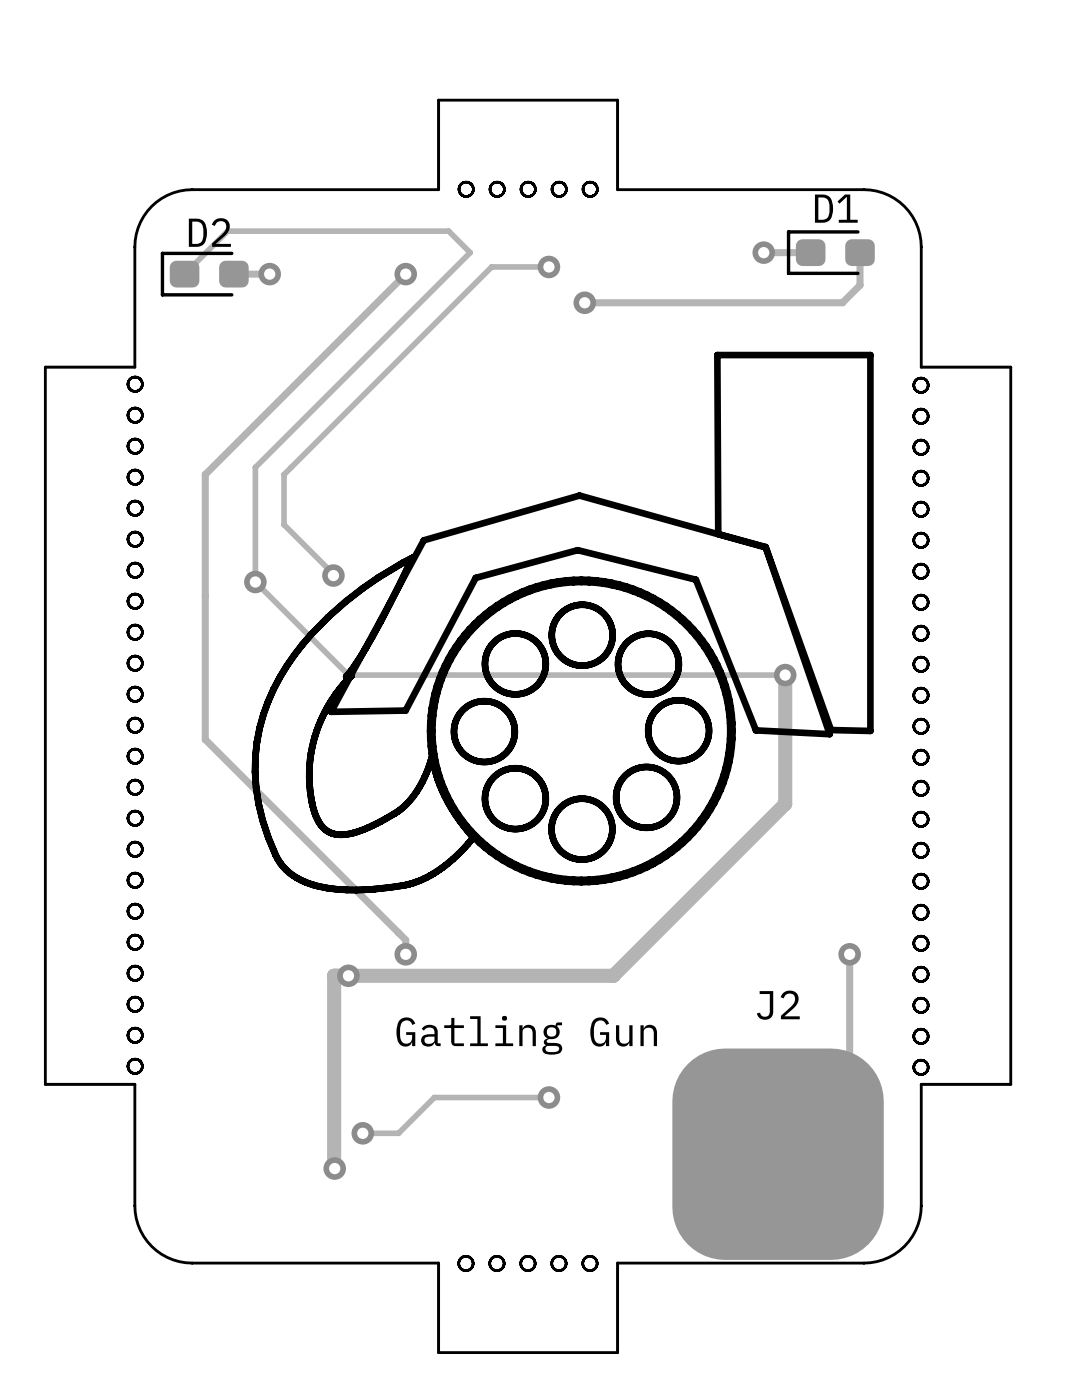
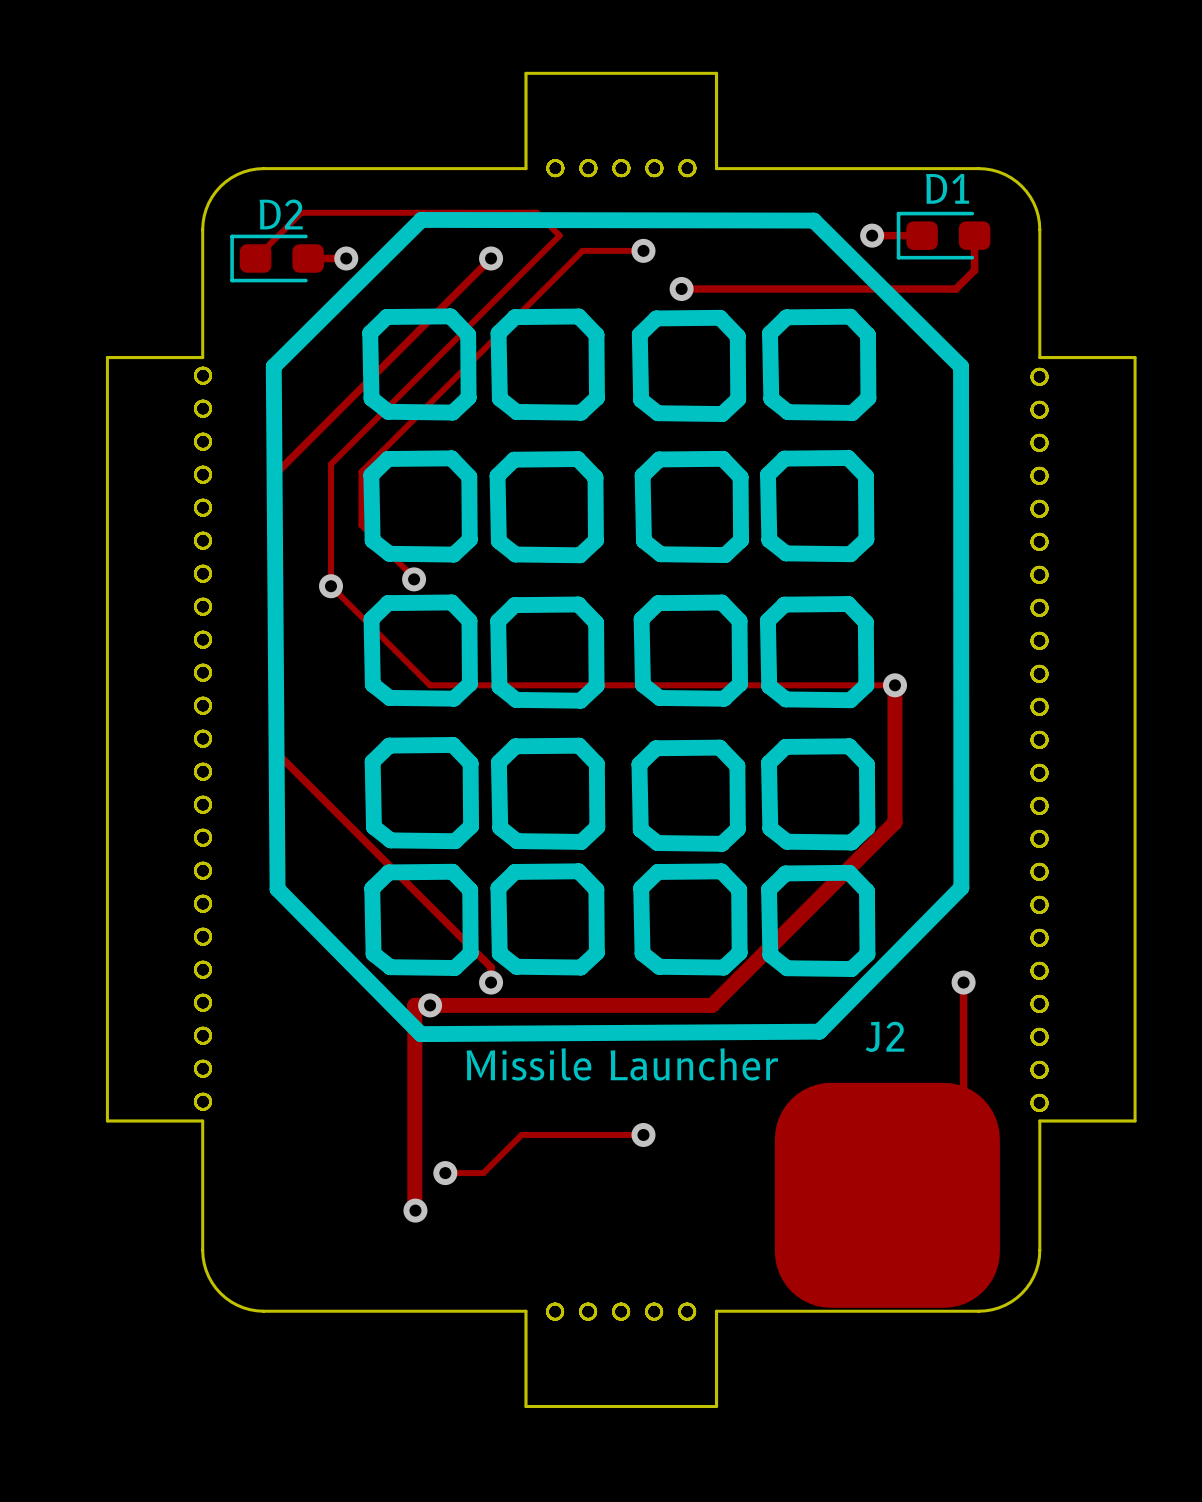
line: none -> (421, 219) (813, 220) (961, 366) (961, 887) (819, 1031) (420, 1034) (277, 889) (273, 366) (421, 219)
line: none -> (450, 316) (386, 316) (370, 333) (371, 398) (388, 411) (452, 412) (468, 397) (468, 334) (450, 316)
line: none -> (578, 316) (515, 317) (498, 333) (499, 398) (516, 411) (581, 412) (596, 397) (596, 334) (578, 316)
line: none -> (850, 316) (867, 335) (868, 398) (852, 412) (788, 412) (771, 398) (770, 333) (786, 317) (850, 316)
line: none -> (720, 317) (737, 336) (738, 399) (722, 414) (657, 413) (641, 400) (639, 334) (656, 318) (720, 317)
line: (717, 355) (718, 534) (765, 547) (831, 730) (870, 730) (870, 355) (717, 355) -> none
line: none -> (451, 458) (469, 476) (469, 539) (453, 554) (389, 553) (372, 540) (371, 475) (387, 458) (451, 458)
line: none -> (848, 457) (784, 458) (767, 474) (769, 540) (786, 553) (850, 554) (866, 539) (865, 476) (848, 457)
line: none -> (577, 459) (514, 459) (497, 475) (498, 541) (515, 554) (580, 555) (595, 540) (595, 477) (577, 459)
line: none -> (722, 458) (659, 459) (642, 475) (643, 541) (660, 554) (725, 555) (741, 540) (740, 477) (722, 458)
line: (579, 495) (423, 540) (331, 711) (405, 710) (475, 577) (577, 550) (695, 579) (755, 730) (829, 734) (765, 547) (579, 495) -> none
line: (412, 557) (362, 588) (328, 617) (310, 634) (279, 677) (263, 714) (256, 742) (255, 771) (262, 820) (280, 863) (293, 875) (313, 885) (337, 889) (356, 890) (390, 887) (413, 882) (430, 875) (445, 865) (473, 837) (458, 818) (444, 795) (436, 775) (432, 754) (422, 781) (409, 801) (394, 813) (364, 829) (344, 834) (329, 832) (318, 821) (311, 802) (309, 777) (310, 758) (320, 721) (335, 694) (351, 675) (346, 676) (372, 636) (412, 557) -> none
line: (573, 581) (604, 582) (632, 589) (659, 602) (682, 619) (701, 641) (716, 665) (726, 693) (731, 723) (729, 753) (722, 782) (709, 808) (692, 831) (671, 851) (646, 866) (618, 876) (589, 880) (558, 879) (529, 871) (503, 859) (480, 842) (461, 820) (446, 796) (435, 768) (431, 738) (432, 708) (440, 679) (452, 653) (470, 630) (491, 610) (516, 595) (543, 585) (573, 581) -> none
line: none -> (451, 602) (388, 603) (371, 619) (372, 684) (389, 697) (454, 698) (469, 683) (469, 620) (451, 602)
line: none -> (721, 602) (658, 603) (641, 619) (642, 684) (659, 697) (724, 698) (740, 683) (739, 620) (721, 602)
line: none -> (848, 604) (865, 622) (866, 685) (850, 700) (785, 699) (769, 686) (767, 620) (784, 604) (848, 604)
line: none -> (578, 604) (596, 622) (596, 685) (580, 700) (516, 699) (499, 686) (498, 621) (514, 605) (578, 604)
line: (580, 604) (592, 606) (602, 612) (609, 621) (612, 633) (610, 645) (604, 655) (595, 662) (583, 665) (571, 663) (561, 657) (554, 648) (551, 636) (553, 624) (559, 614) (569, 607) (580, 604) -> none
line: (513, 633) (525, 635) (535, 641) (542, 651) (545, 662) (544, 673) (537, 684) (528, 691) (516, 694) (505, 692) (495, 686) (487, 676) (484, 665) (486, 653) (492, 643) (502, 636) (513, 633) -> none
line: (646, 633) (658, 635) (668, 641) (676, 651) (678, 662) (677, 674) (671, 684) (661, 691) (649, 694) (638, 692) (628, 686) (620, 676) (618, 665) (619, 654) (625, 643) (635, 636) (646, 633) -> none
line: (677, 700) (689, 702) (699, 708) (706, 717) (709, 729) (707, 741) (701, 751) (691, 758) (680, 761) (668, 759) (658, 753) (651, 743) (648, 732) (650, 720) (656, 710) (665, 703) (677, 700) -> none
line: (482, 701) (471, 704) (461, 711) (455, 721) (454, 733) (456, 744) (463, 754) (473, 760) (485, 761) (497, 759) (506, 752) (512, 742) (514, 730) (511, 718) (504, 709) (494, 703) (482, 701) -> none
line: none -> (452, 744) (470, 763) (471, 826) (455, 841) (390, 840) (373, 827) (372, 761) (389, 745) (452, 744)
line: none -> (579, 745) (596, 764) (597, 827) (581, 841) (516, 841) (500, 827) (498, 762) (515, 746) (579, 745)
line: none -> (849, 746) (785, 746) (768, 763) (770, 828) (787, 841) (851, 842) (867, 827) (866, 764) (849, 746)
line: none -> (719, 747) (737, 765) (737, 828) (721, 843) (657, 843) (640, 829) (639, 764) (656, 748) (719, 747)
line: (643, 767) (655, 768) (665, 773) (673, 783) (676, 794) (675, 806) (670, 816) (660, 824) (649, 827) (637, 826) (627, 820) (619, 811) (616, 800) (617, 788) (622, 778) (632, 770) (643, 767) -> none
line: (513, 768) (502, 771) (492, 778) (486, 788) (484, 800) (487, 811) (495, 821) (505, 827) (516, 829) (528, 826) (537, 819) (544, 808) (545, 797) (542, 785) (535, 776) (525, 769) (513, 768) -> none
line: (581, 798) (593, 801) (603, 807) (609, 817) (612, 829) (609, 840) (603, 850) (593, 857) (581, 859) (570, 857) (560, 850) (553, 840) (551, 829) (553, 817) (560, 807) (570, 801) (581, 798) -> none
line: none -> (578, 871) (515, 871) (498, 888) (499, 953) (516, 966) (580, 967) (596, 952) (596, 889) (578, 871)
line: none -> (721, 871) (657, 871) (641, 888) (642, 953) (659, 966) (723, 967) (739, 952) (739, 889) (721, 871)
line: none -> (452, 871) (470, 890) (470, 953) (454, 968) (390, 967) (373, 953) (372, 888) (388, 872) (452, 871)
line: none -> (849, 872) (866, 891) (867, 954) (851, 969) (787, 968) (770, 955) (769, 889) (785, 873) (849, 872)
text: Gatling Gun (526, 1035) -> Missile Launcher (622, 1064)

